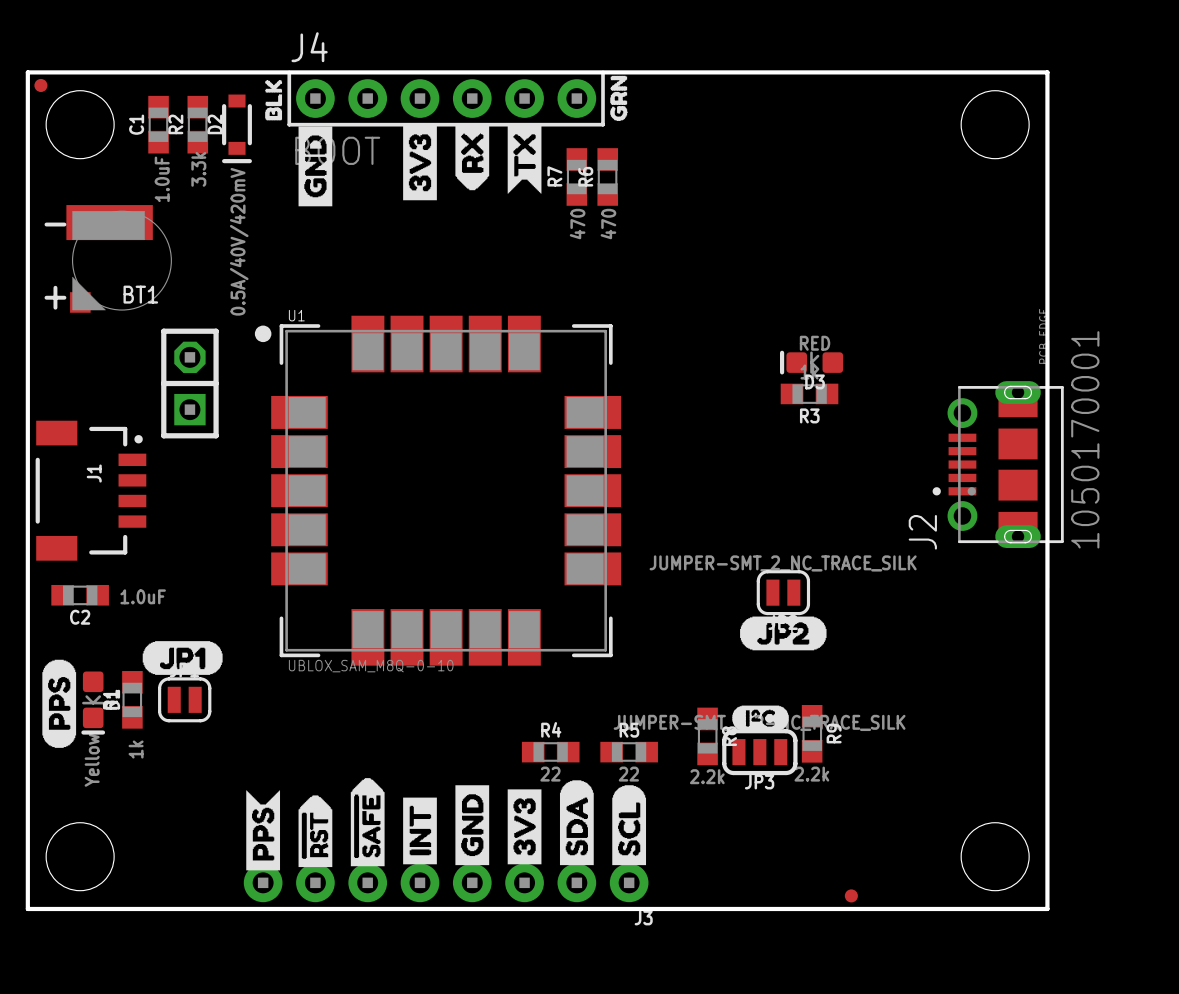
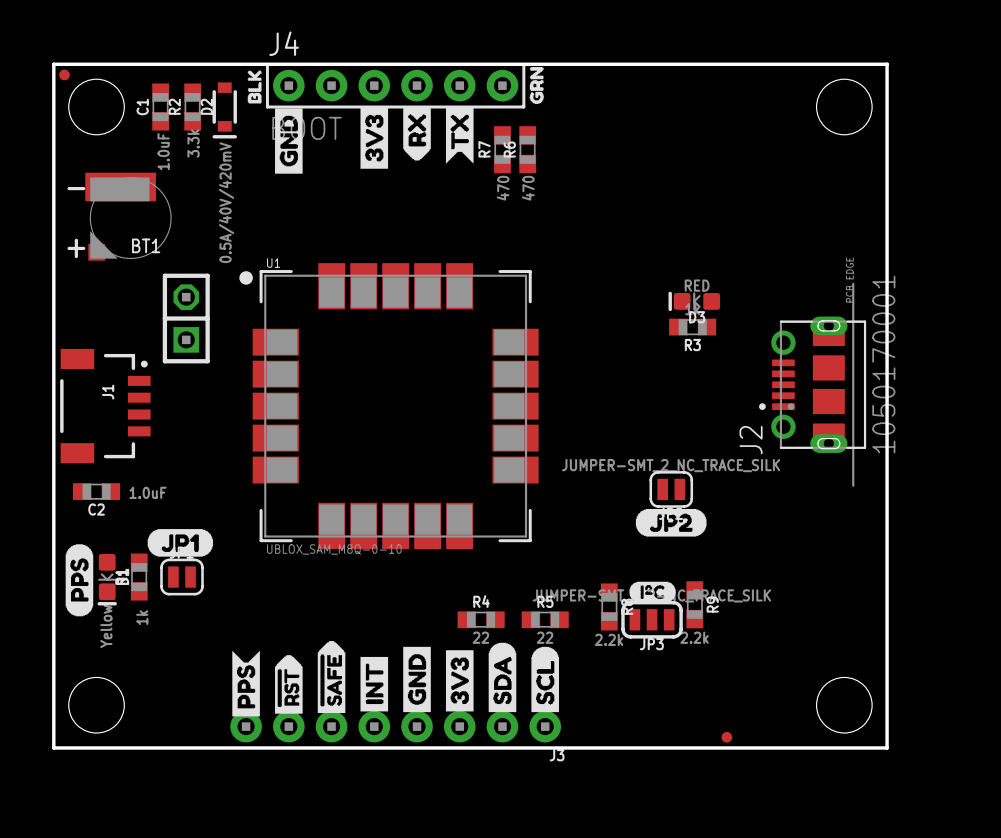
J2 position: (998, 464) -> (812, 384)

